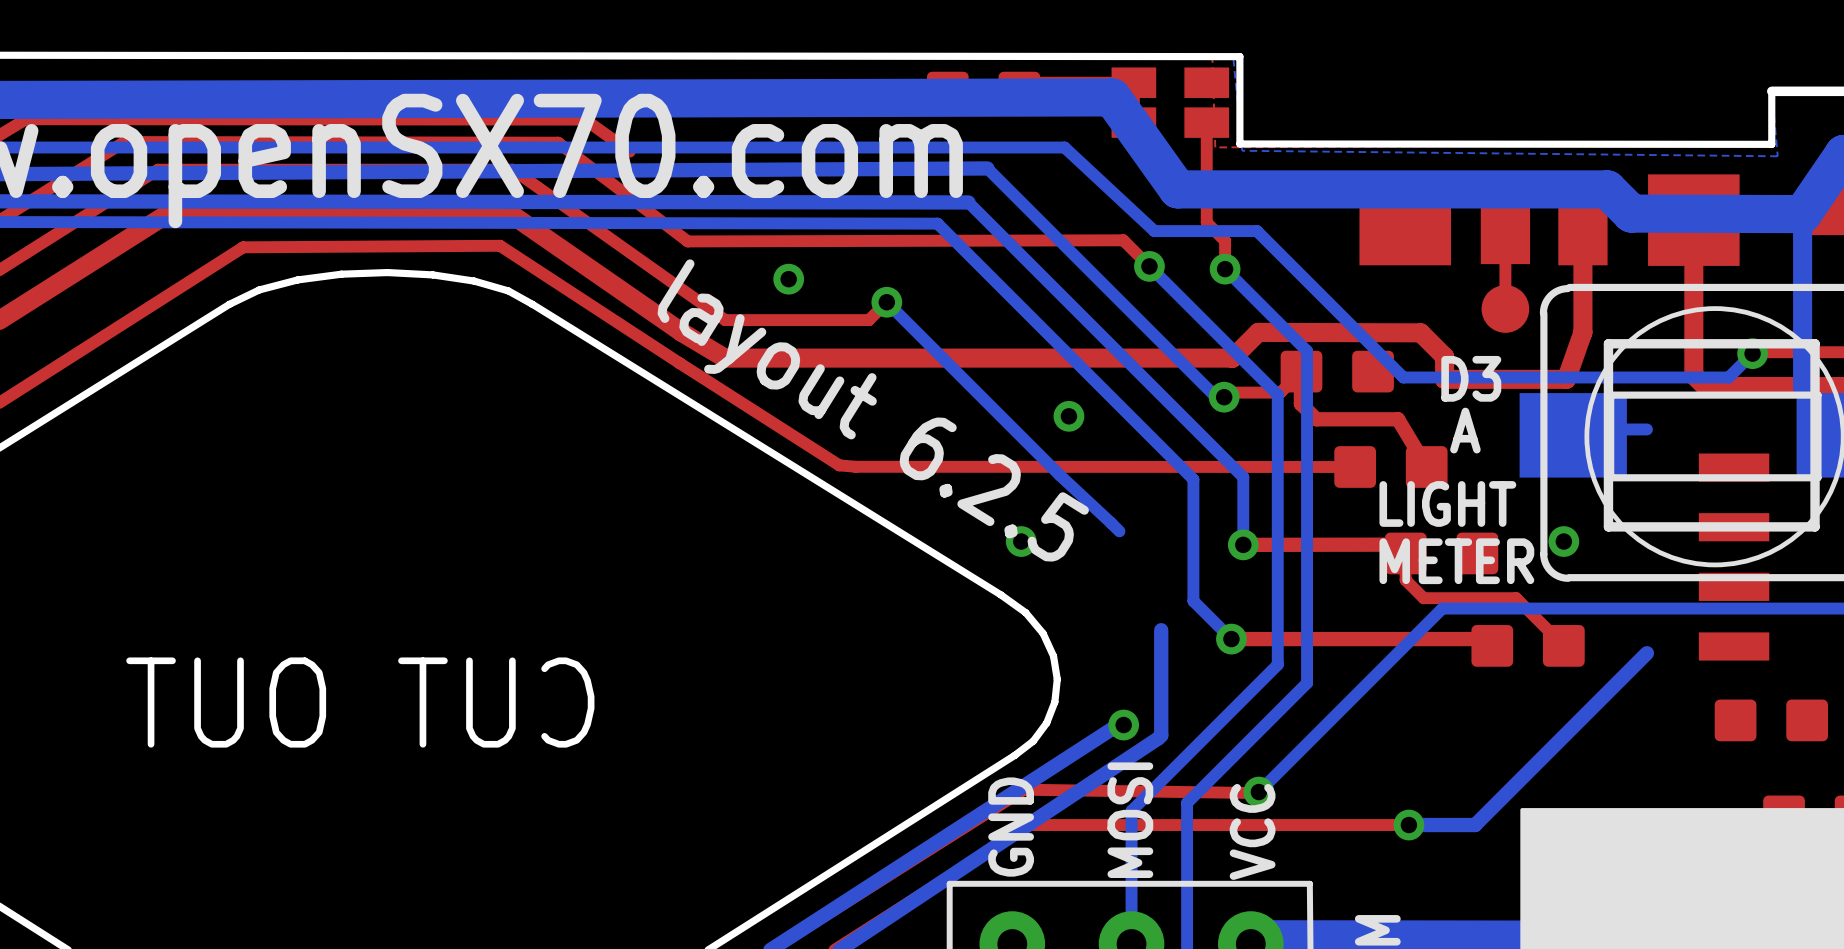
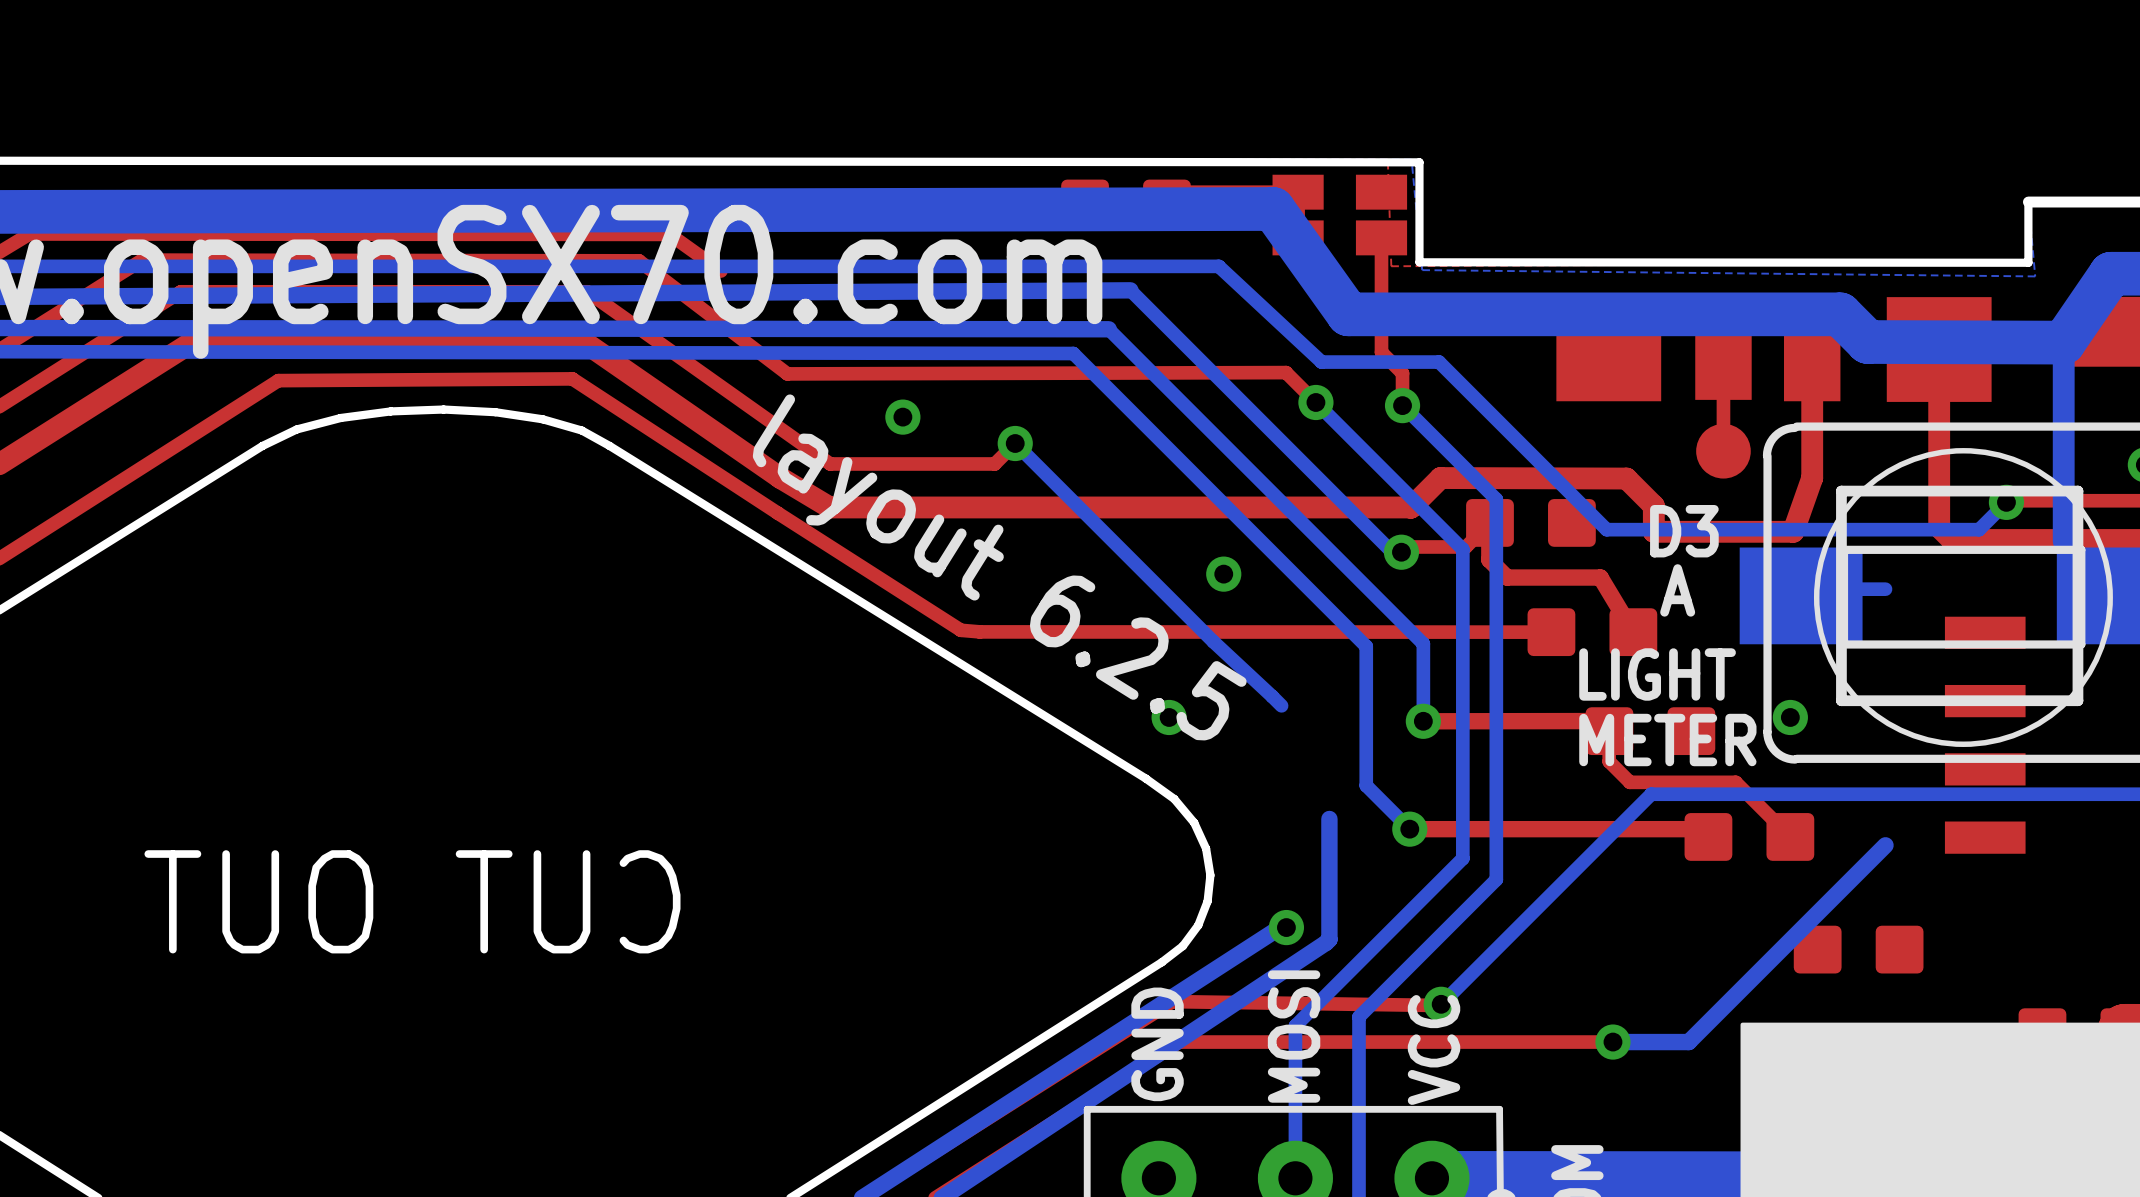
part position: (1771, 720) -> (1858, 949)

